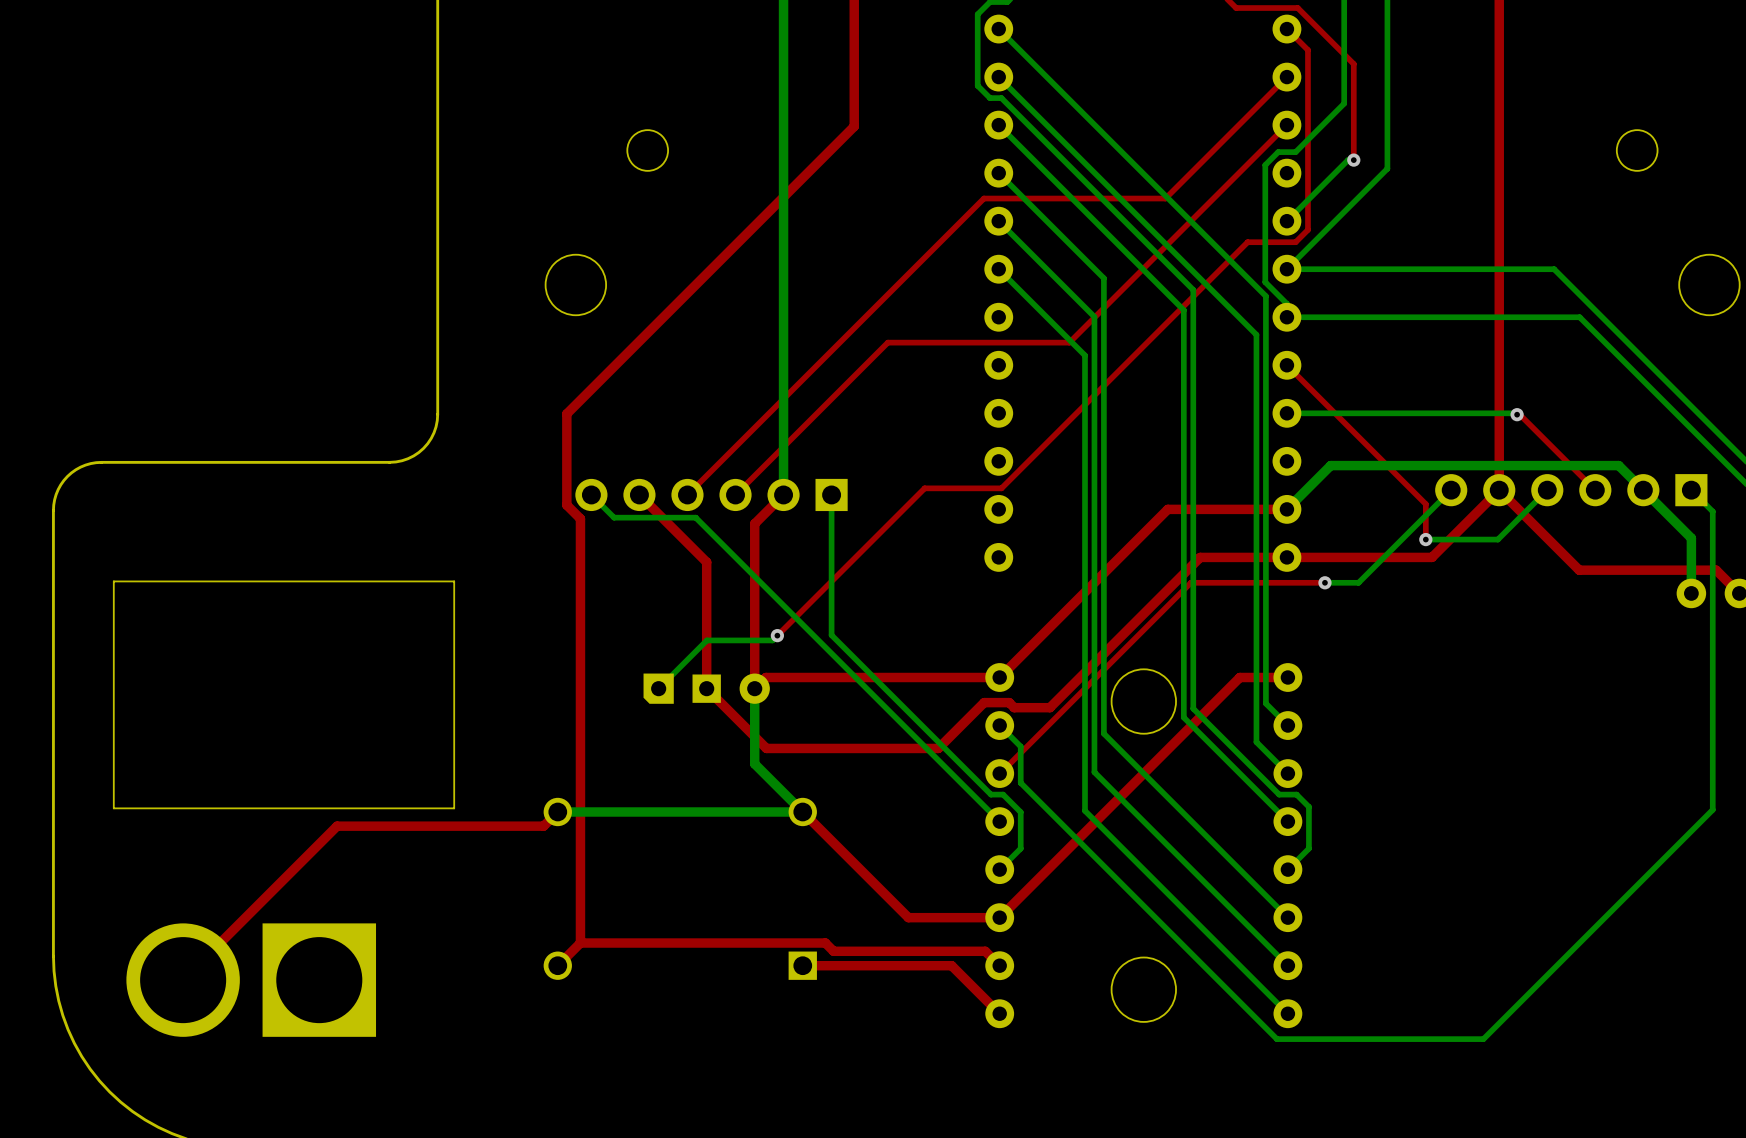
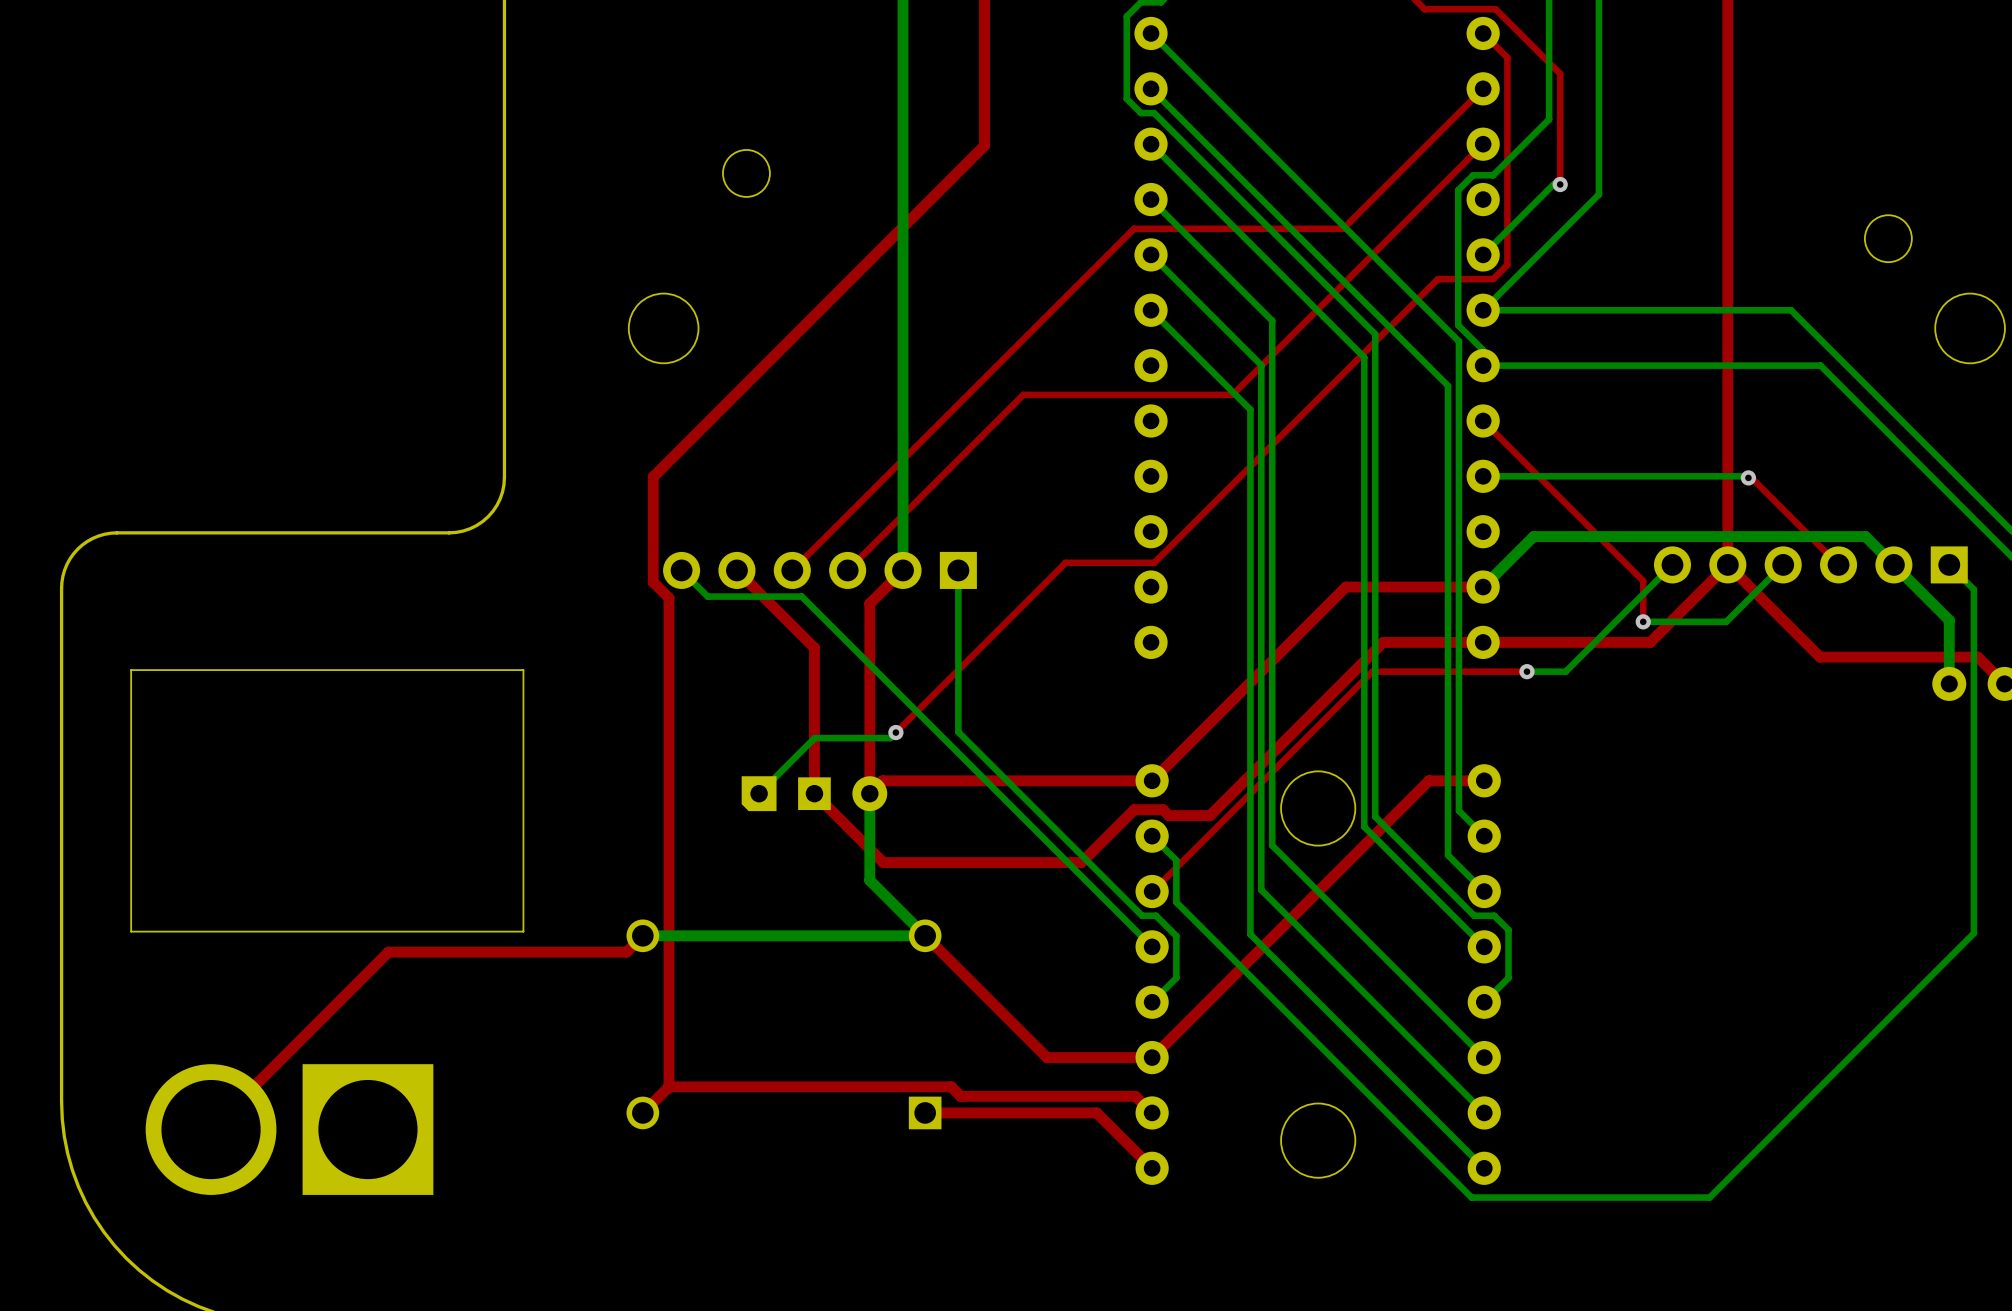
round board edge position: (1637, 150) -> (1888, 238)

